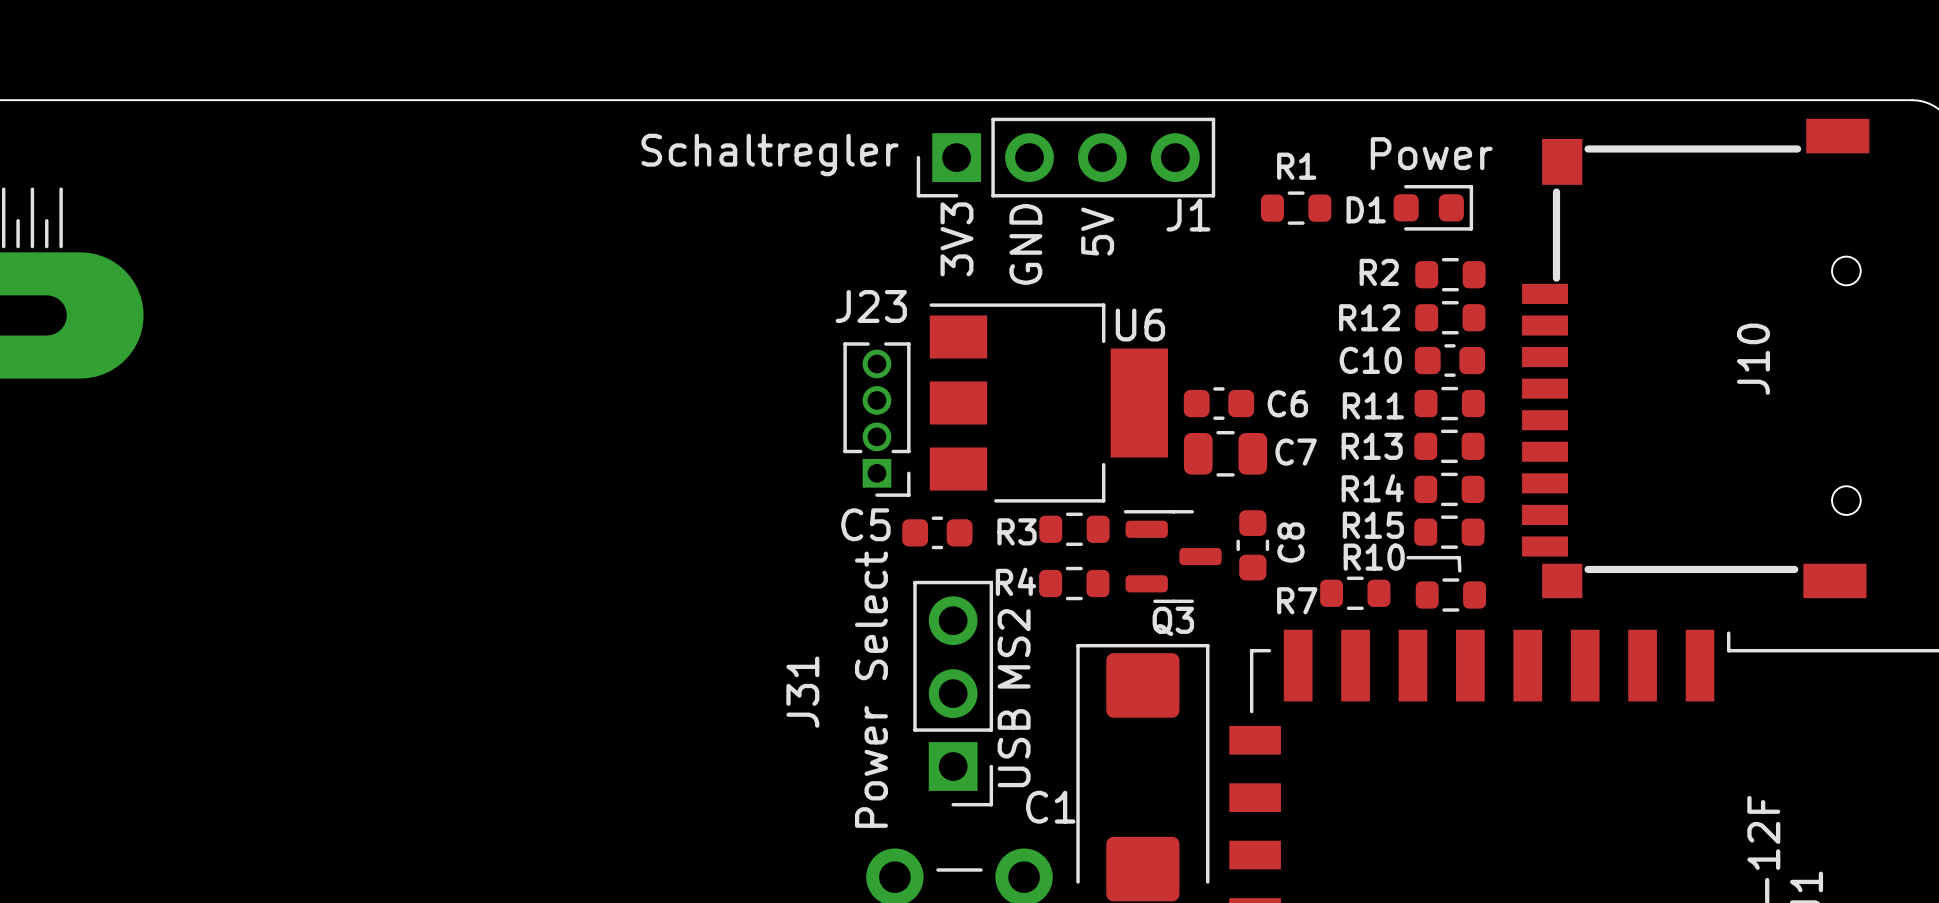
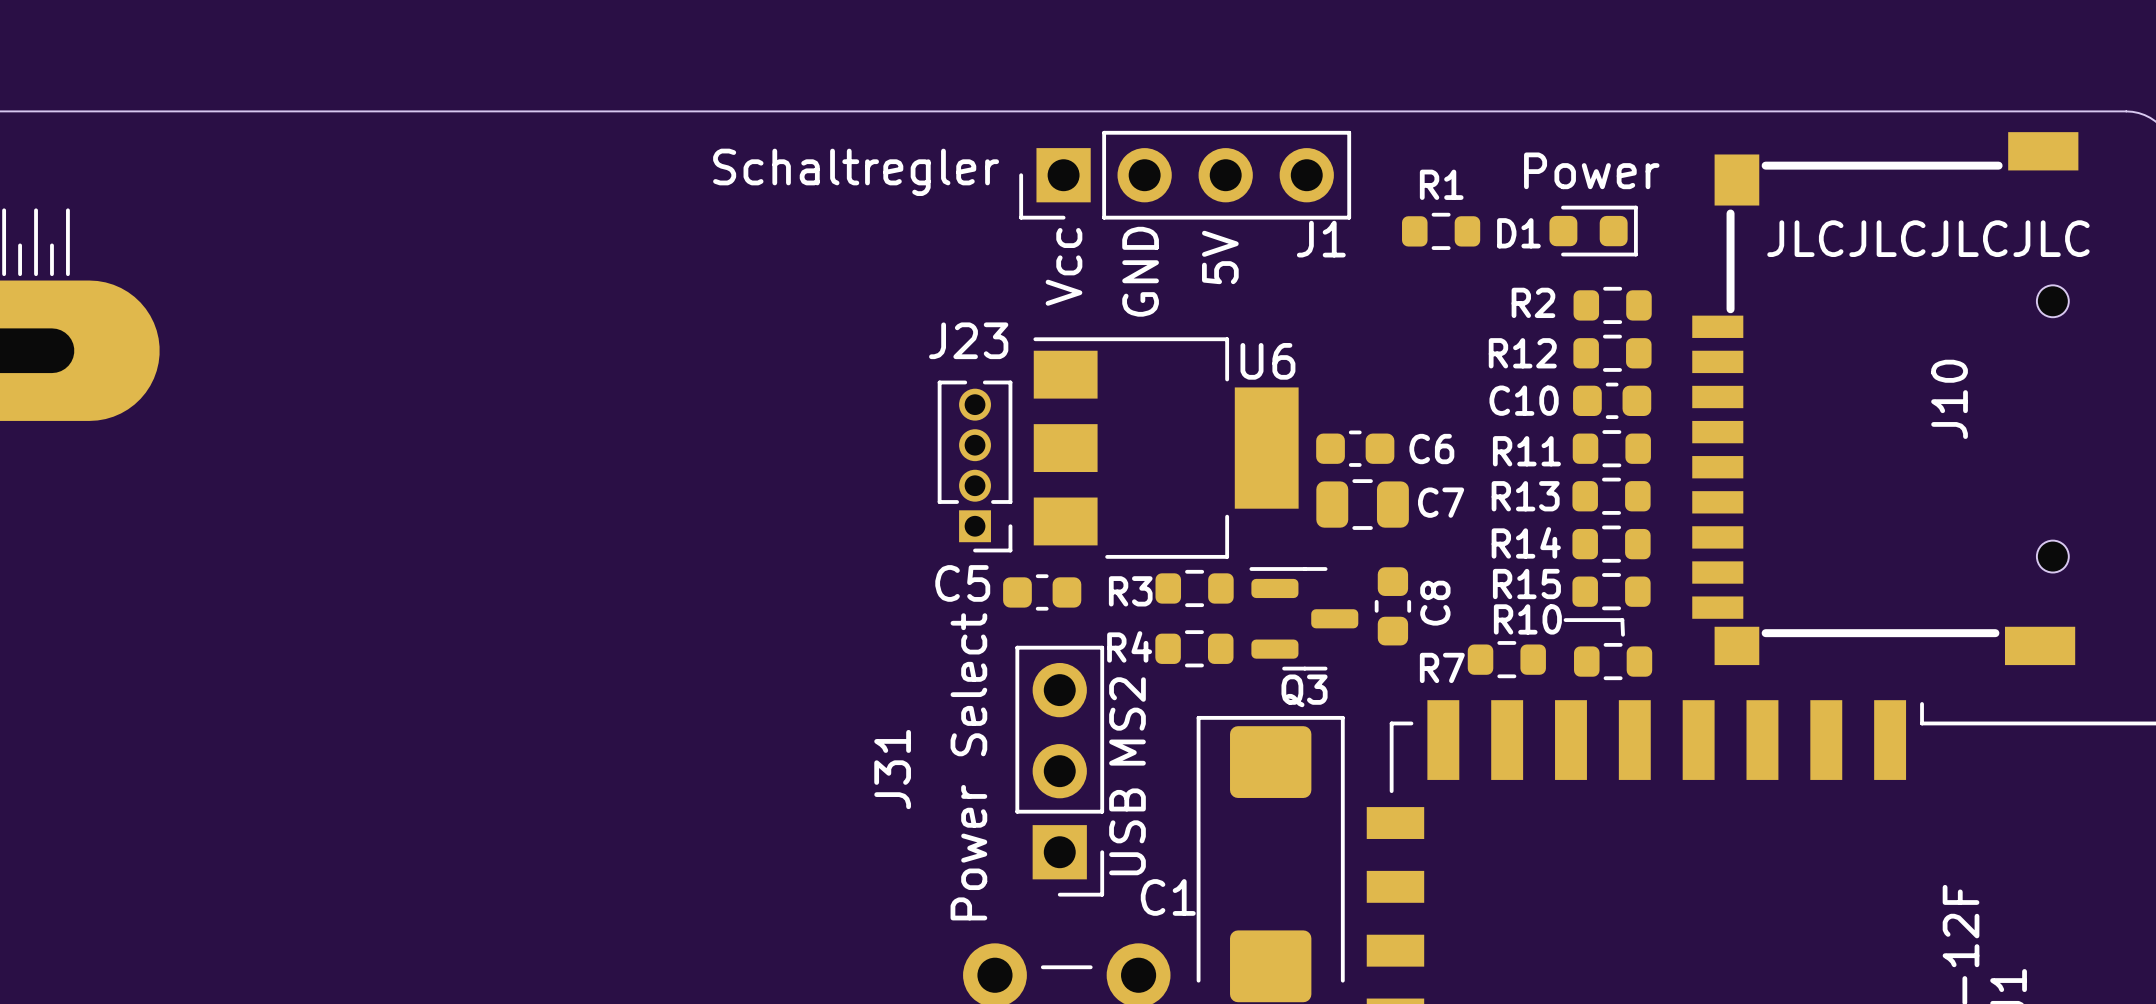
text: none -> JLCJLCJLCJLC (1928, 238)
text: 3V3 (956, 239) -> Vcc (1063, 266)

